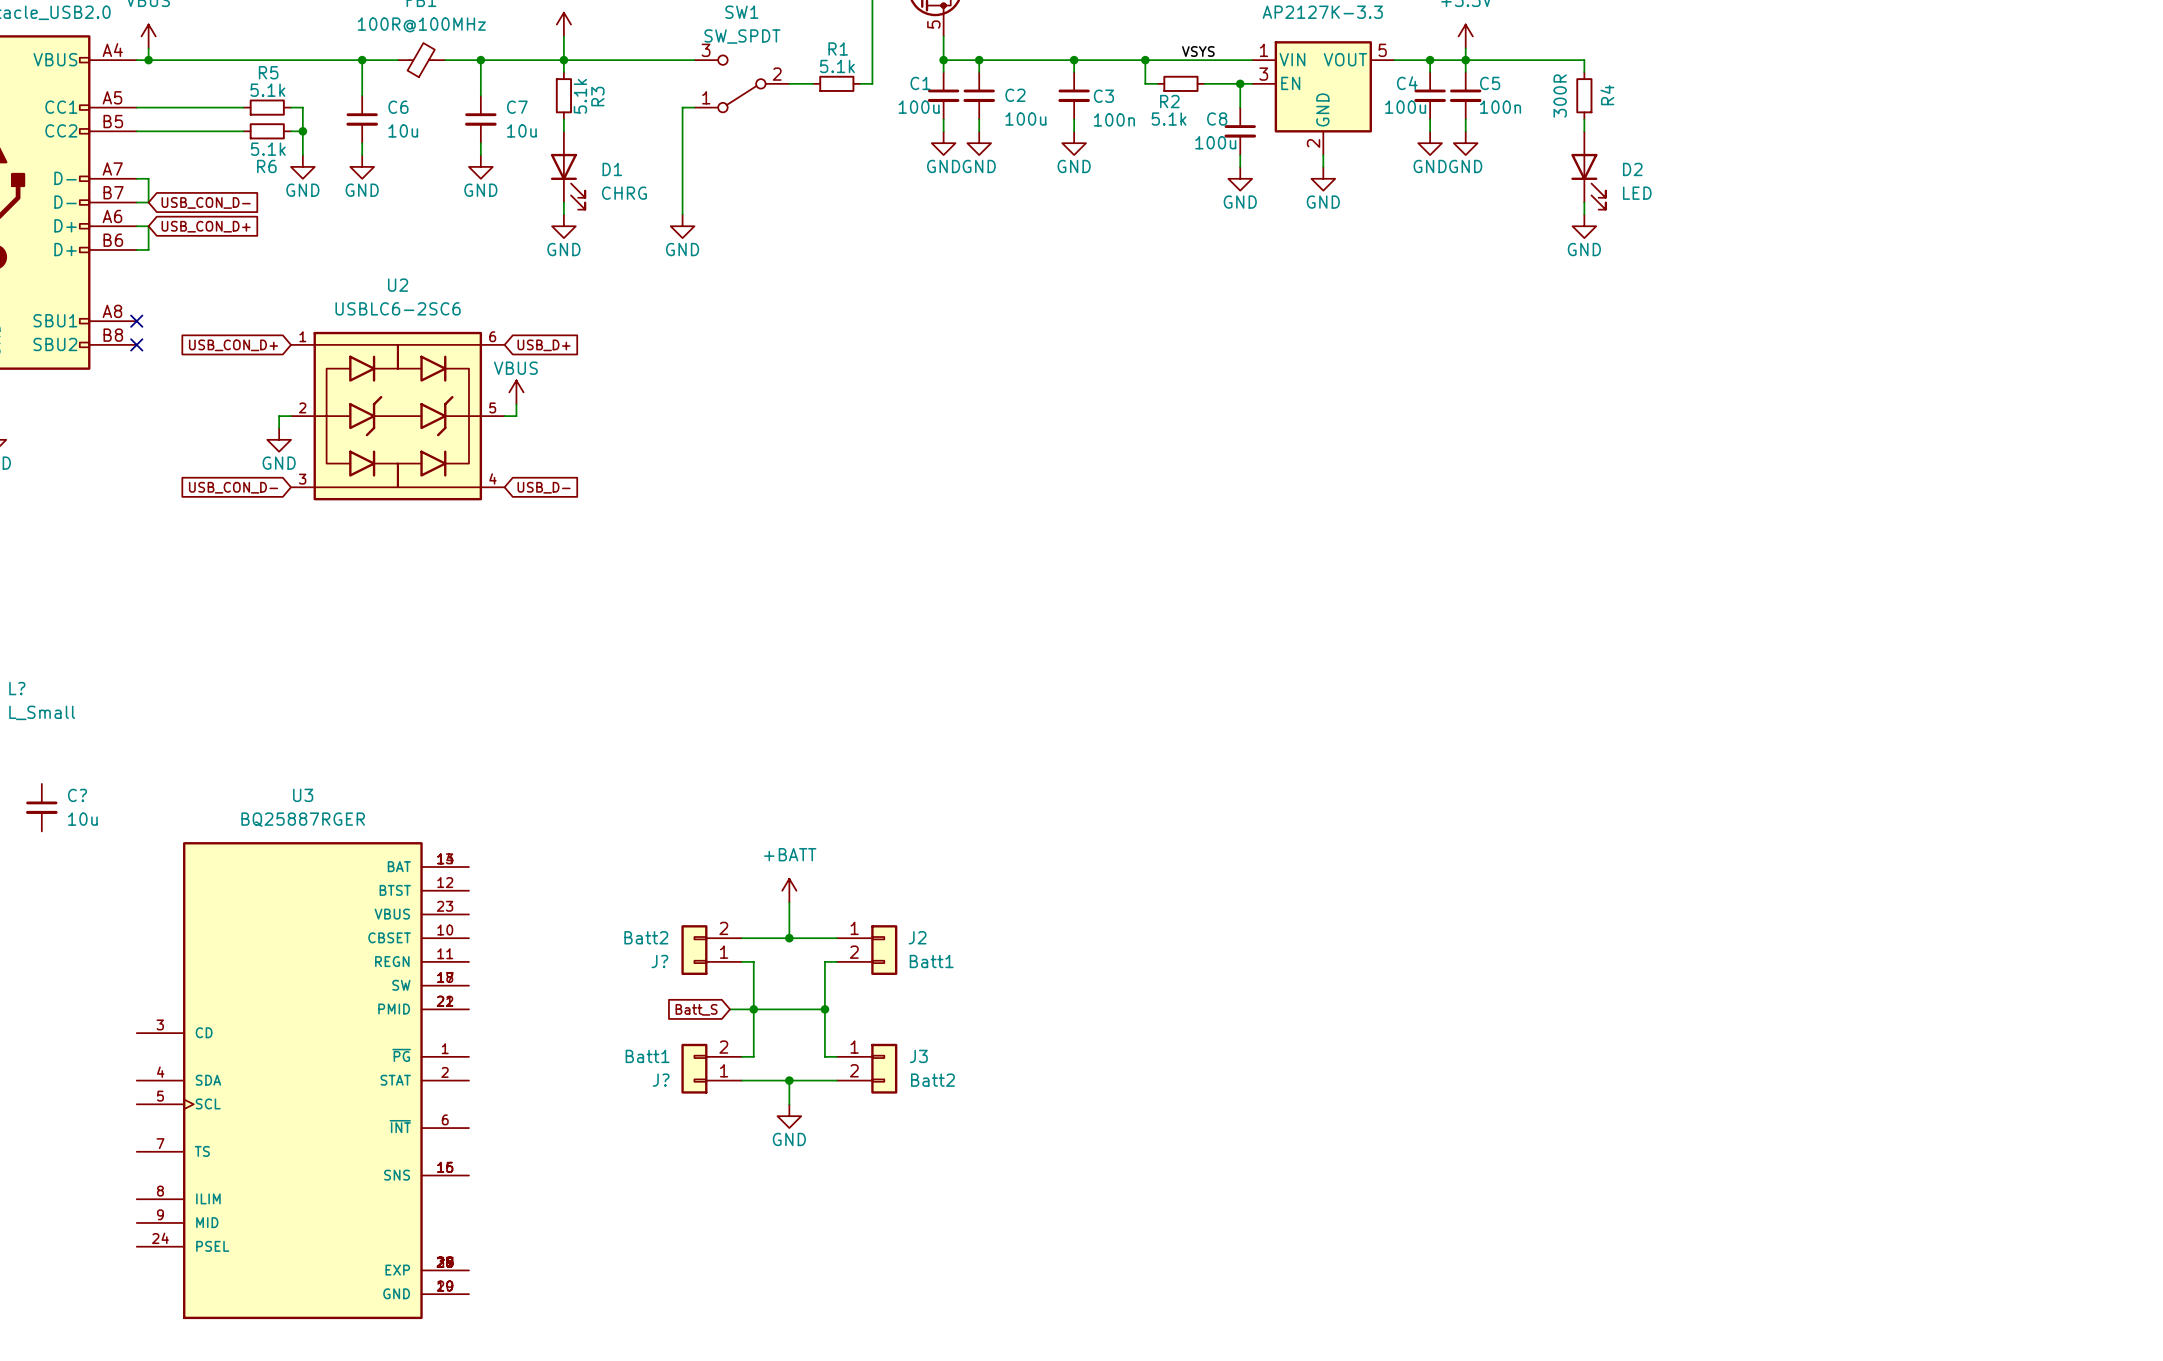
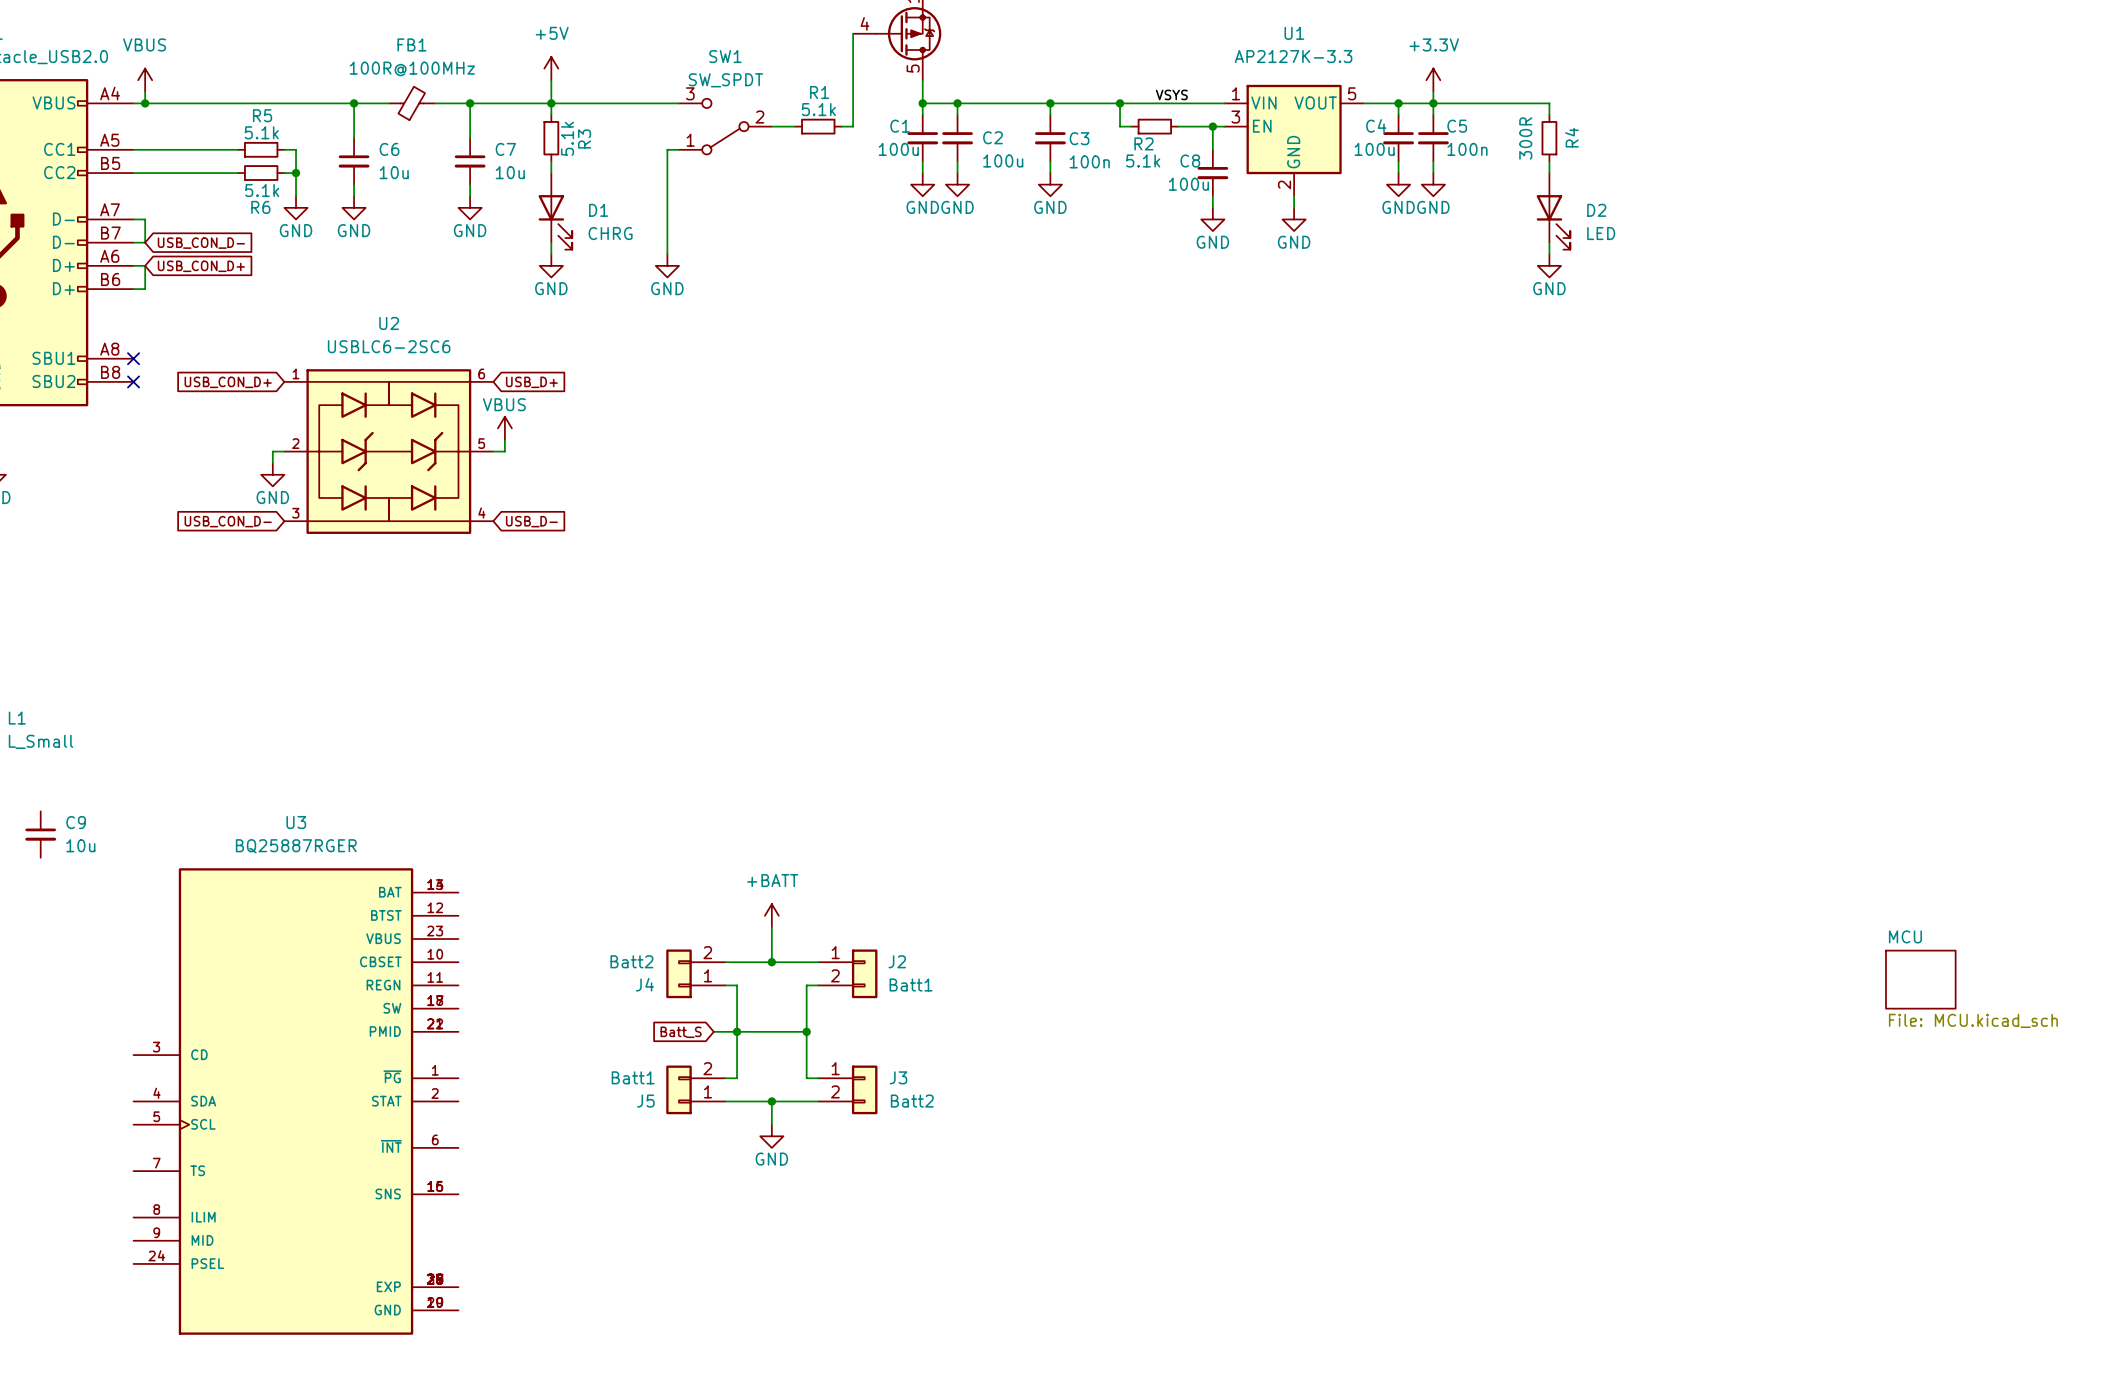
L? name: L? (17, 688) -> L1 (17, 718)
C? name: C? (77, 795) -> C9 (76, 822)
sheet MCU: none -> File: MCU.kicad_sch (1920, 979)
J? name: J? (659, 961) -> J4 (644, 984)
J? name: J? (661, 1080) -> J5 (645, 1101)

